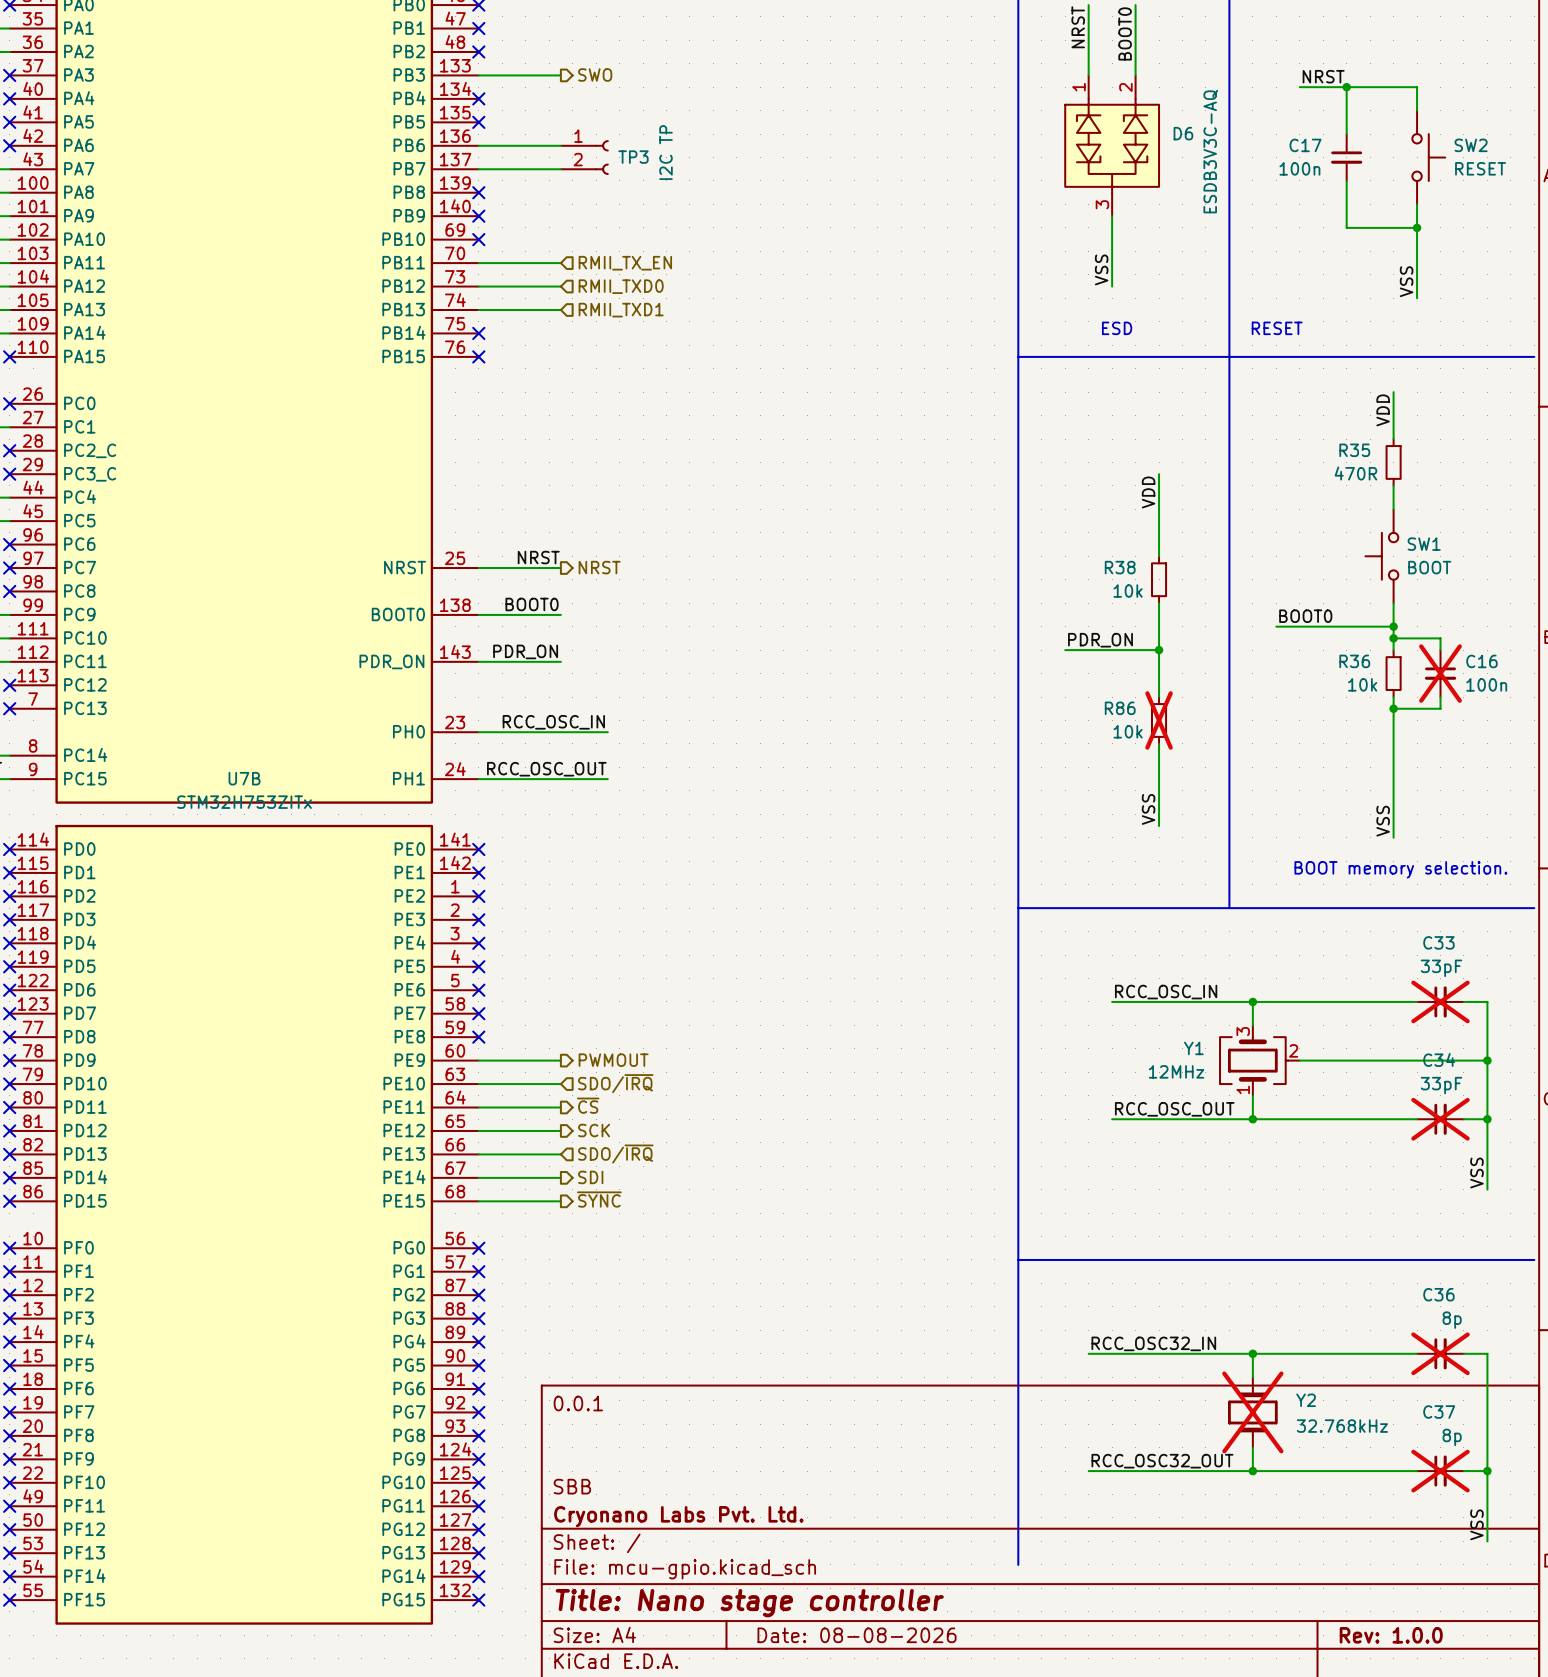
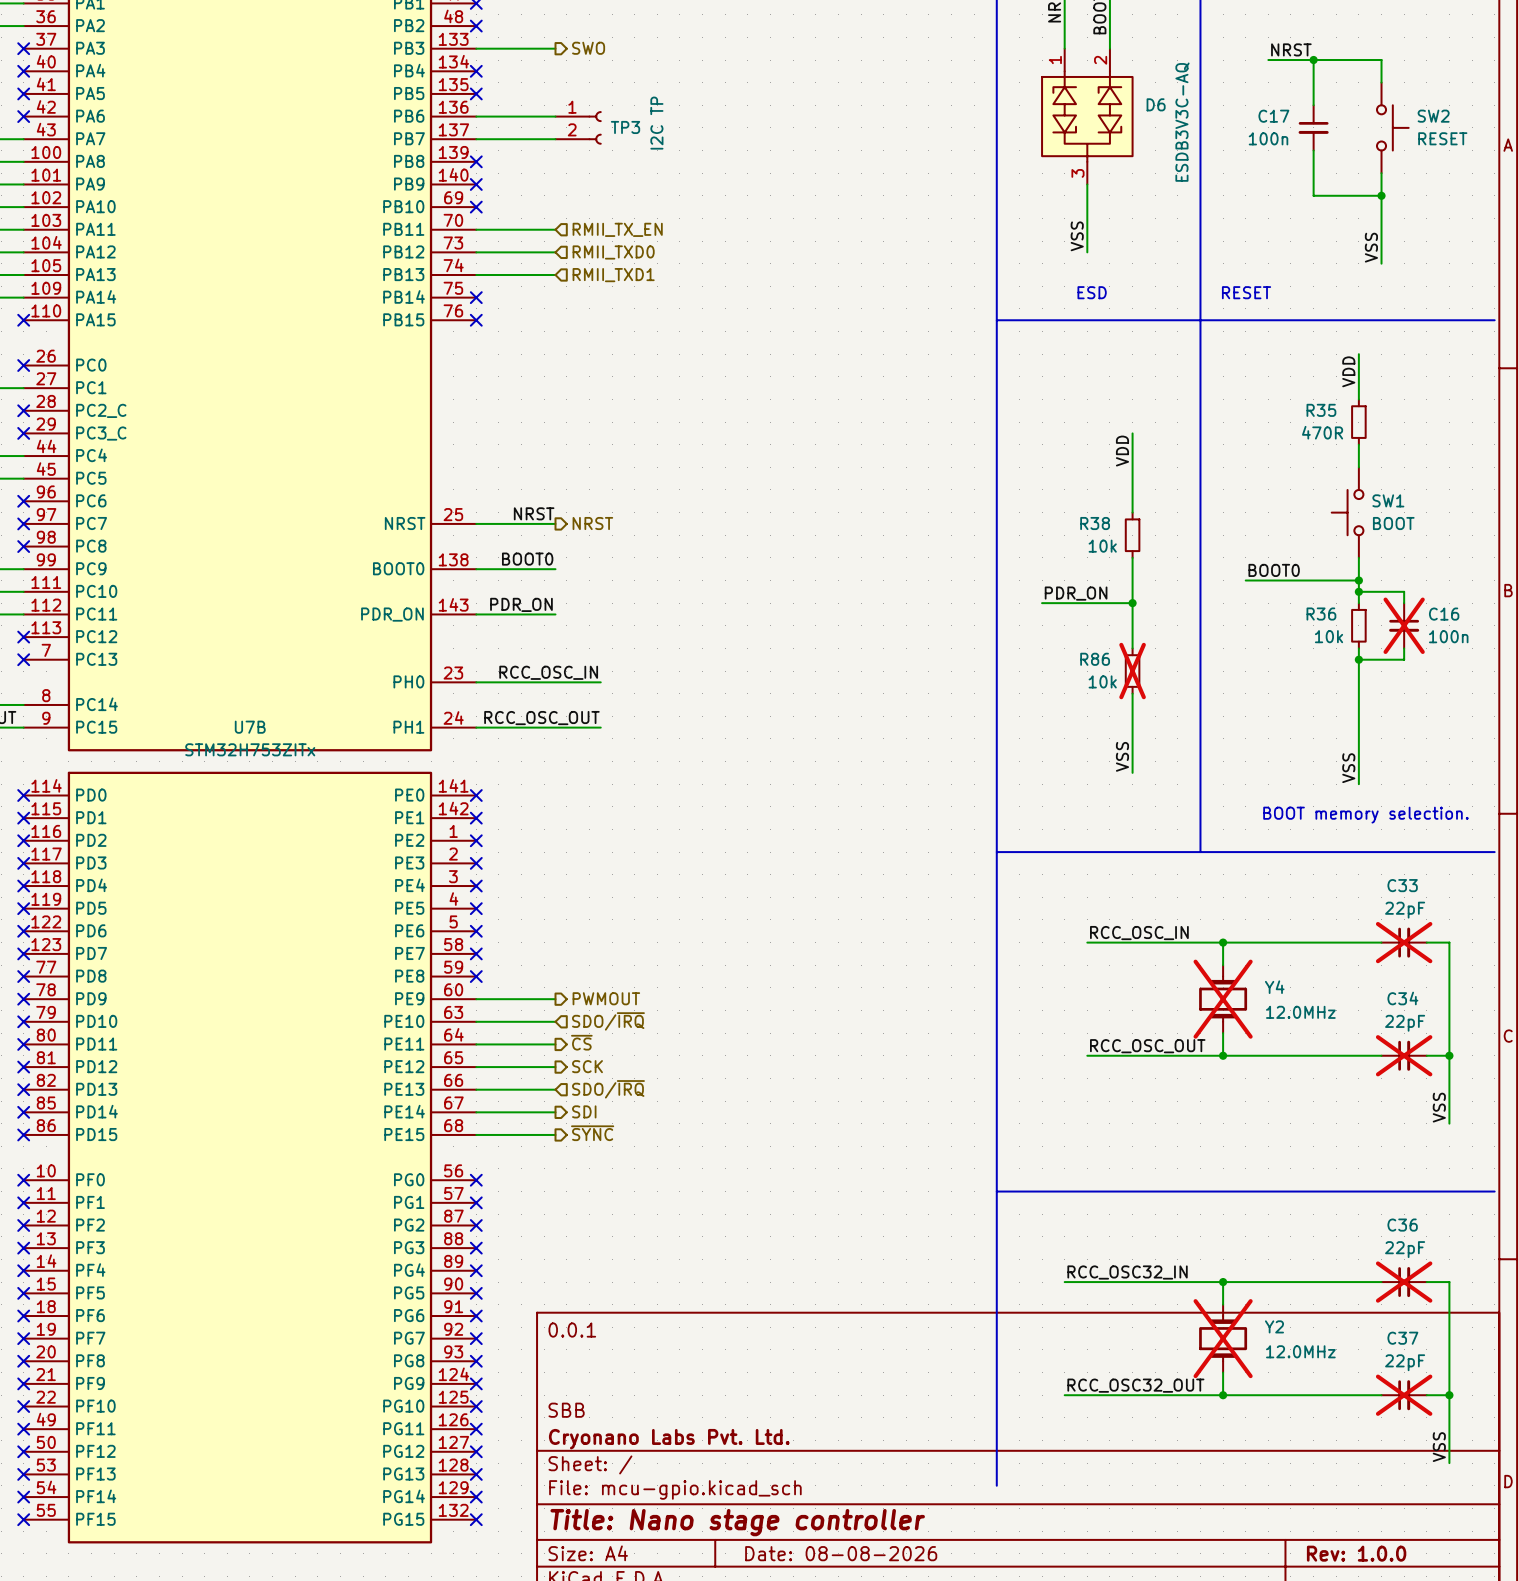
C33 value: 33pF (1441, 968) -> 22pF (1405, 910)
Y4: none -> 12.0MHz (1223, 999)
Y1: 12MHz (1259, 1060) -> none
wire: (1299, 1060) (1487, 1060) -> none
junction: (1487, 1060) -> none
C34 value: 33pF (1441, 1085) -> 22pF (1405, 1023)
C36 value: 8p (1452, 1320) -> 22pF (1405, 1249)
Y2 value: 32.768kHz (1342, 1426) -> 12.0MHz (1300, 1351)
C37 value: 8p (1452, 1437) -> 22pF (1405, 1362)

